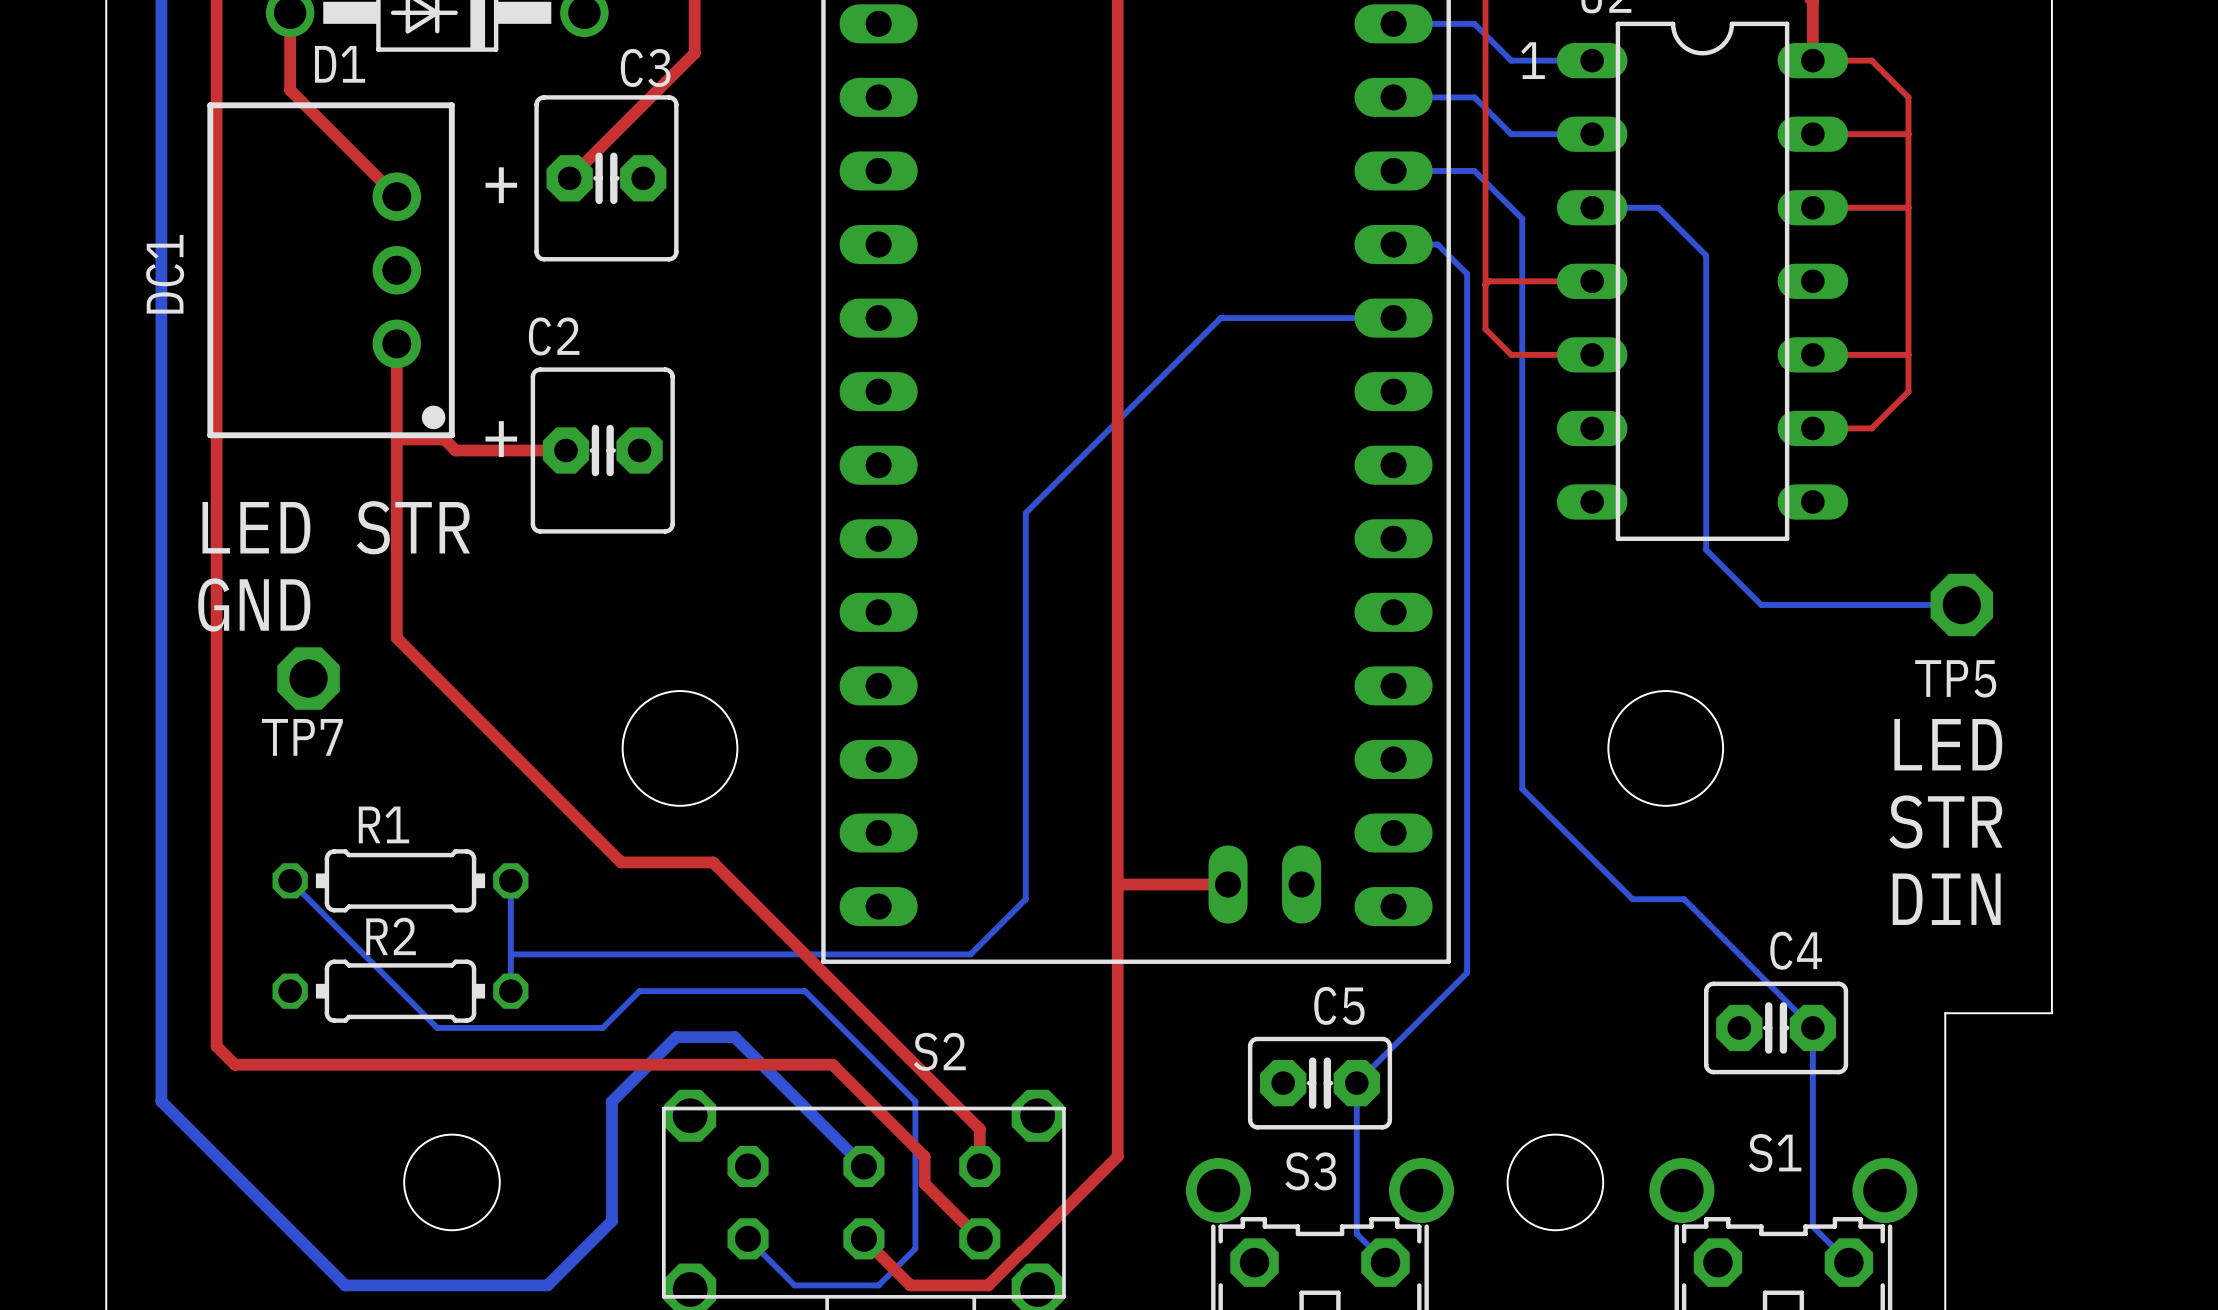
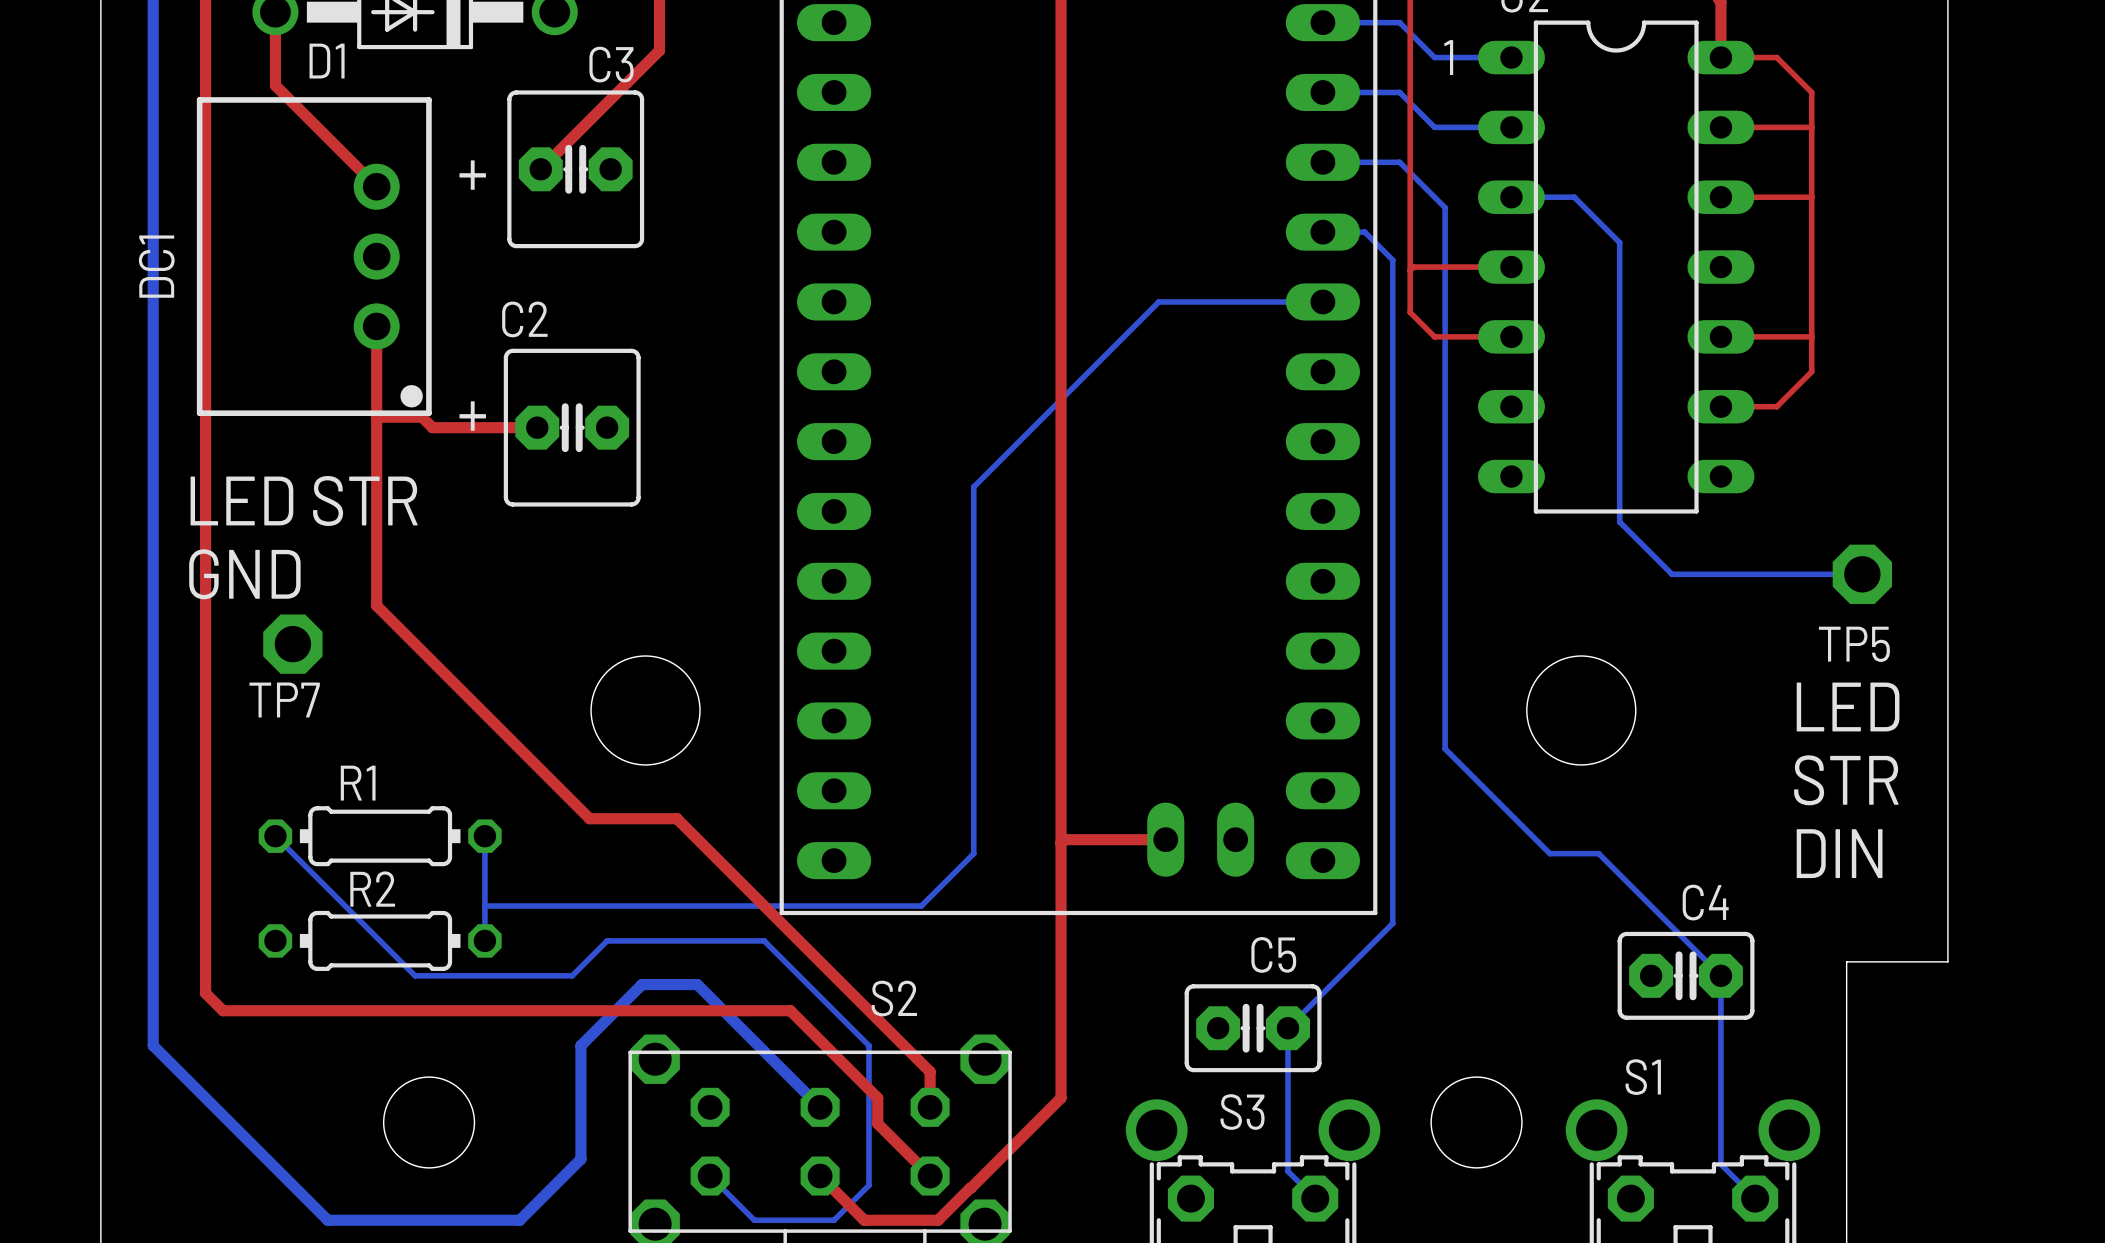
S1 name position: S1 (1775, 1153) -> S1 (1643, 1077)

